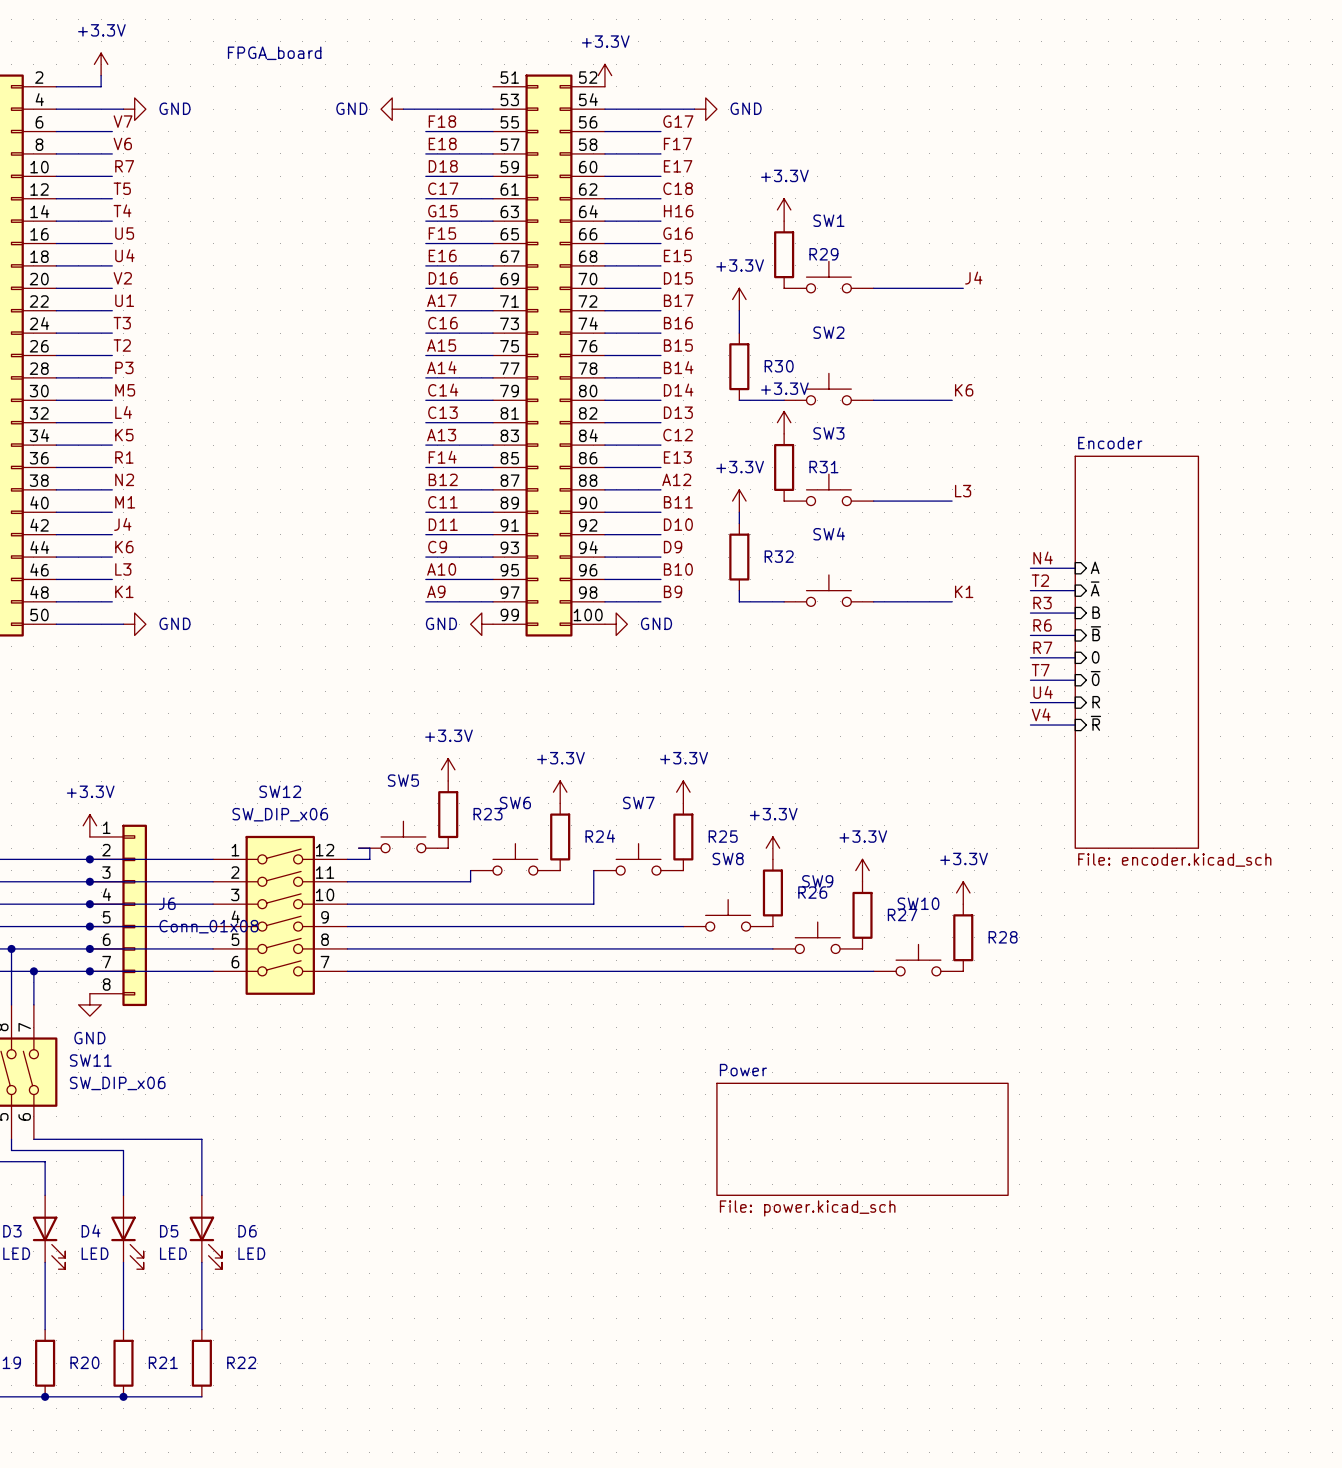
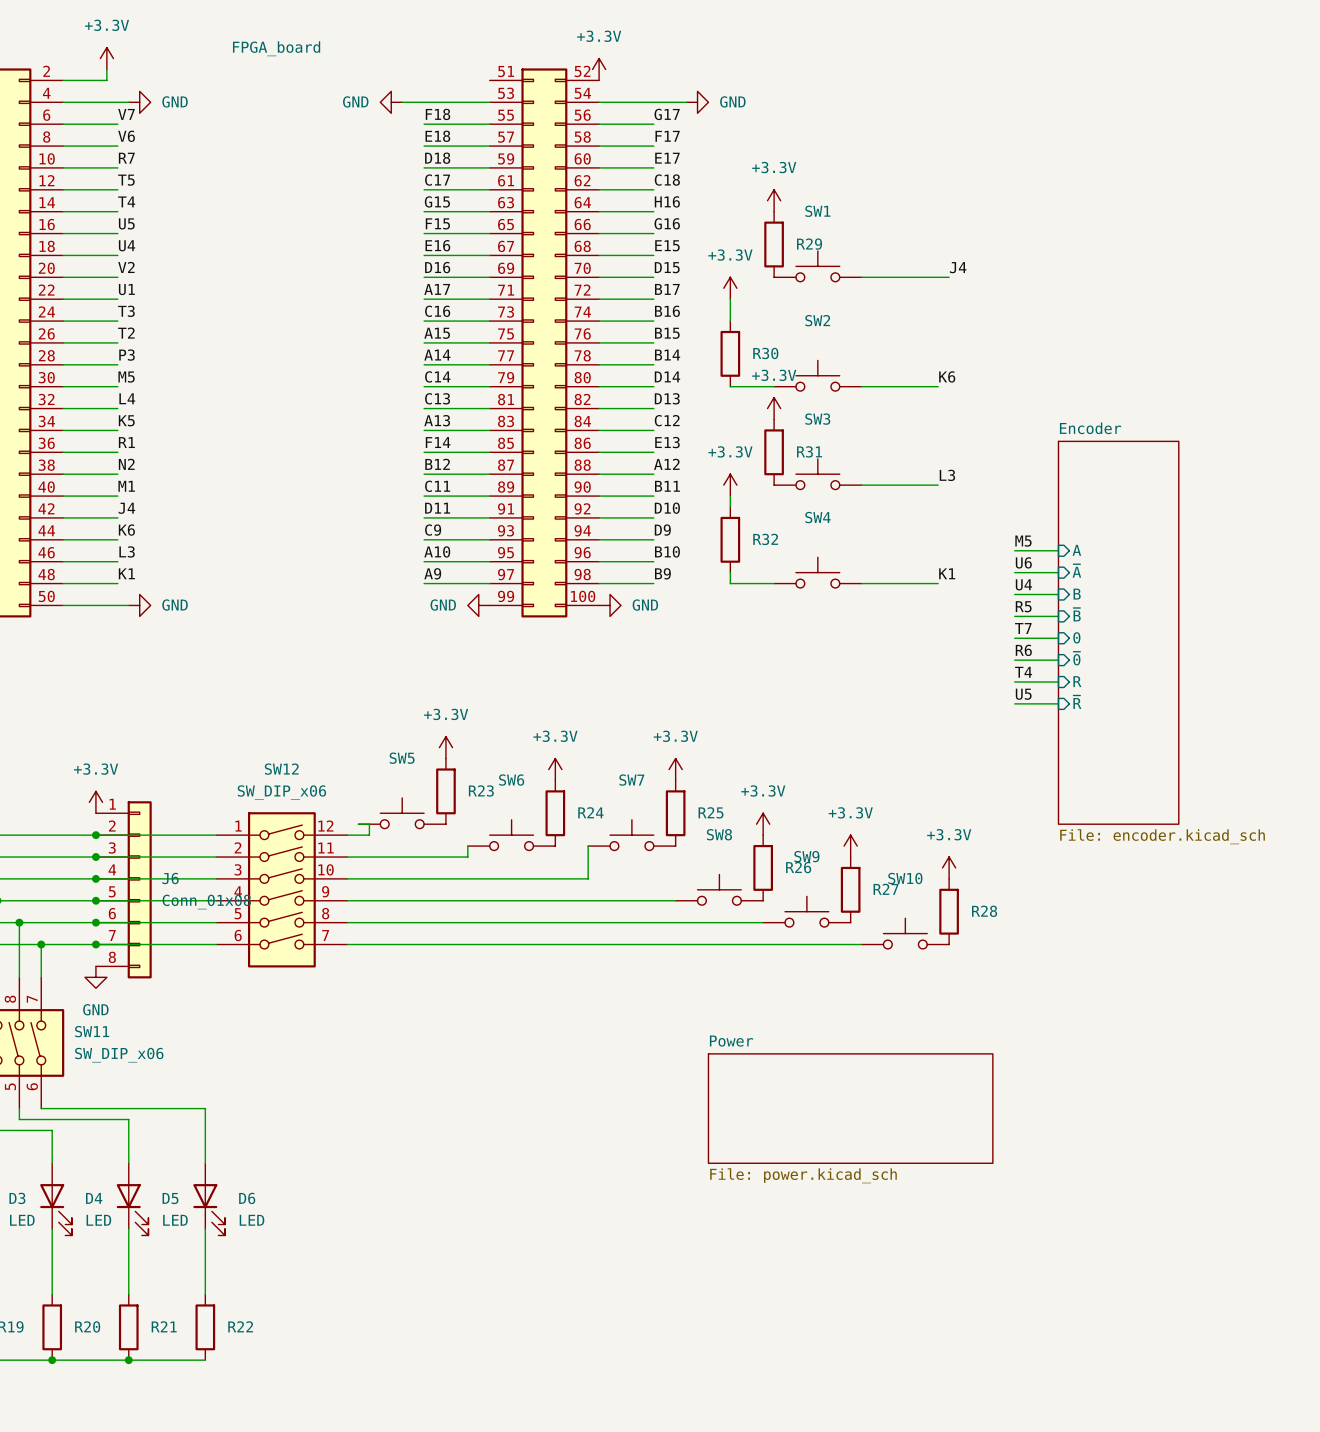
label: N4 (1043, 557) -> M5 (1023, 541)
label: T2 (1040, 580) -> U6 (1023, 562)
label: R3 (1042, 603) -> U4 (1023, 584)
label: R6 (1042, 625) -> R5 (1023, 606)
label: R7 (1042, 647) -> T7 (1023, 628)
label: T7 (1040, 670) -> R6 (1023, 650)
label: U4 (1043, 692) -> T4 (1023, 672)
label: V4 (1041, 714) -> U5 (1023, 694)

